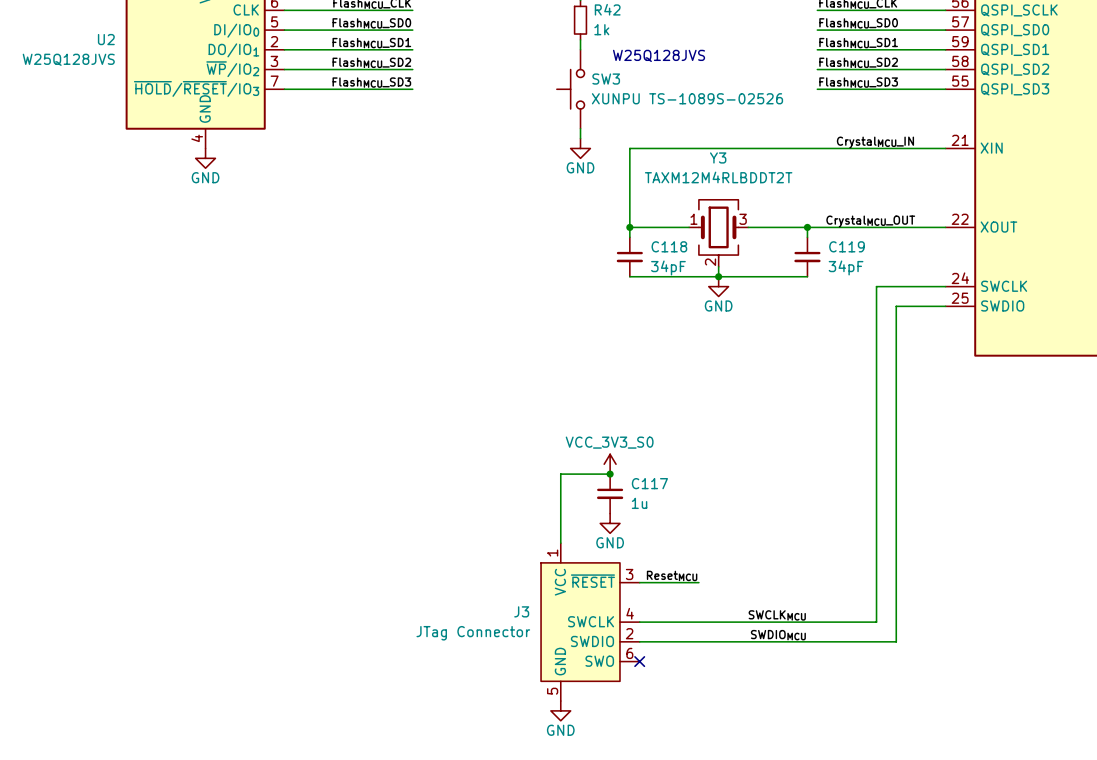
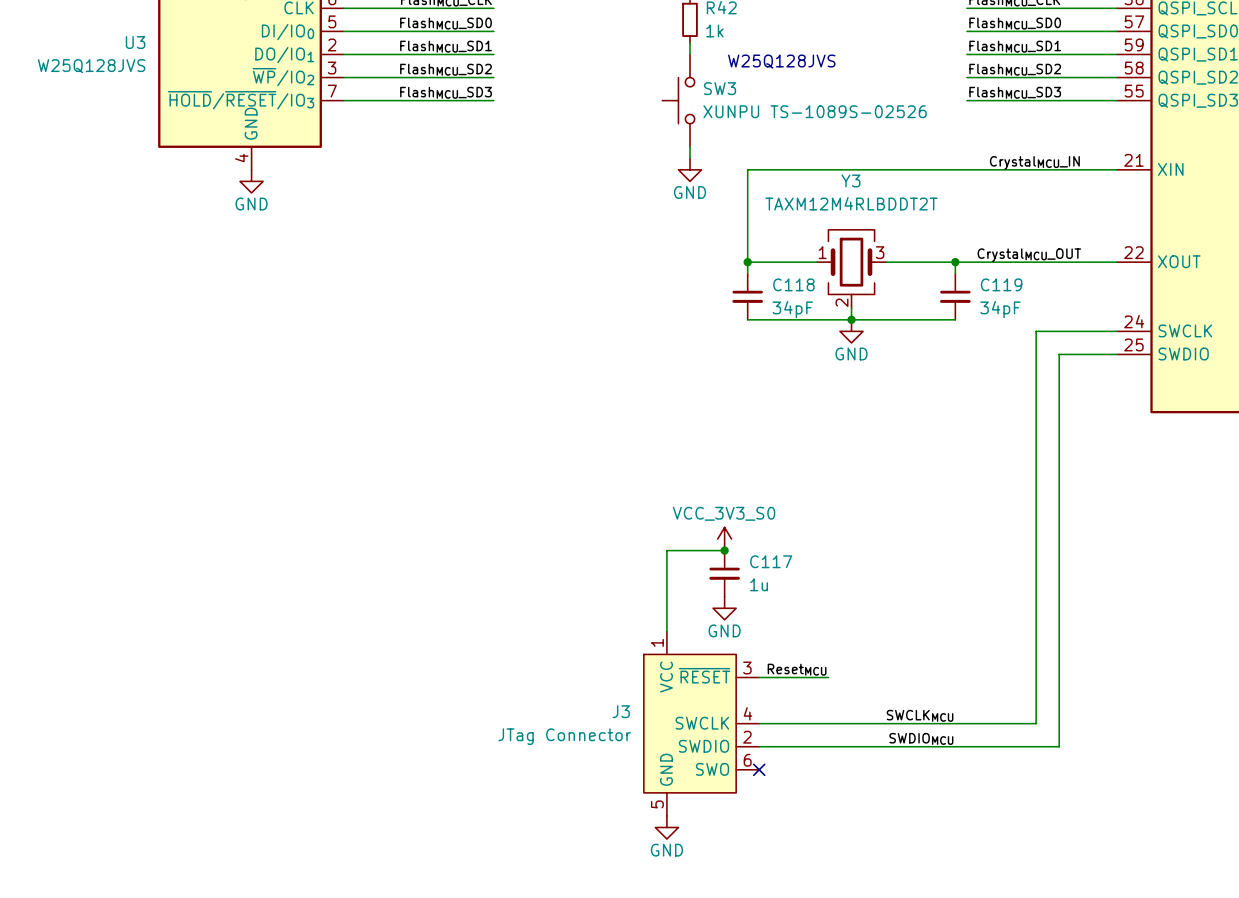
U2 name: U2 (106, 39) -> U3 (135, 42)

